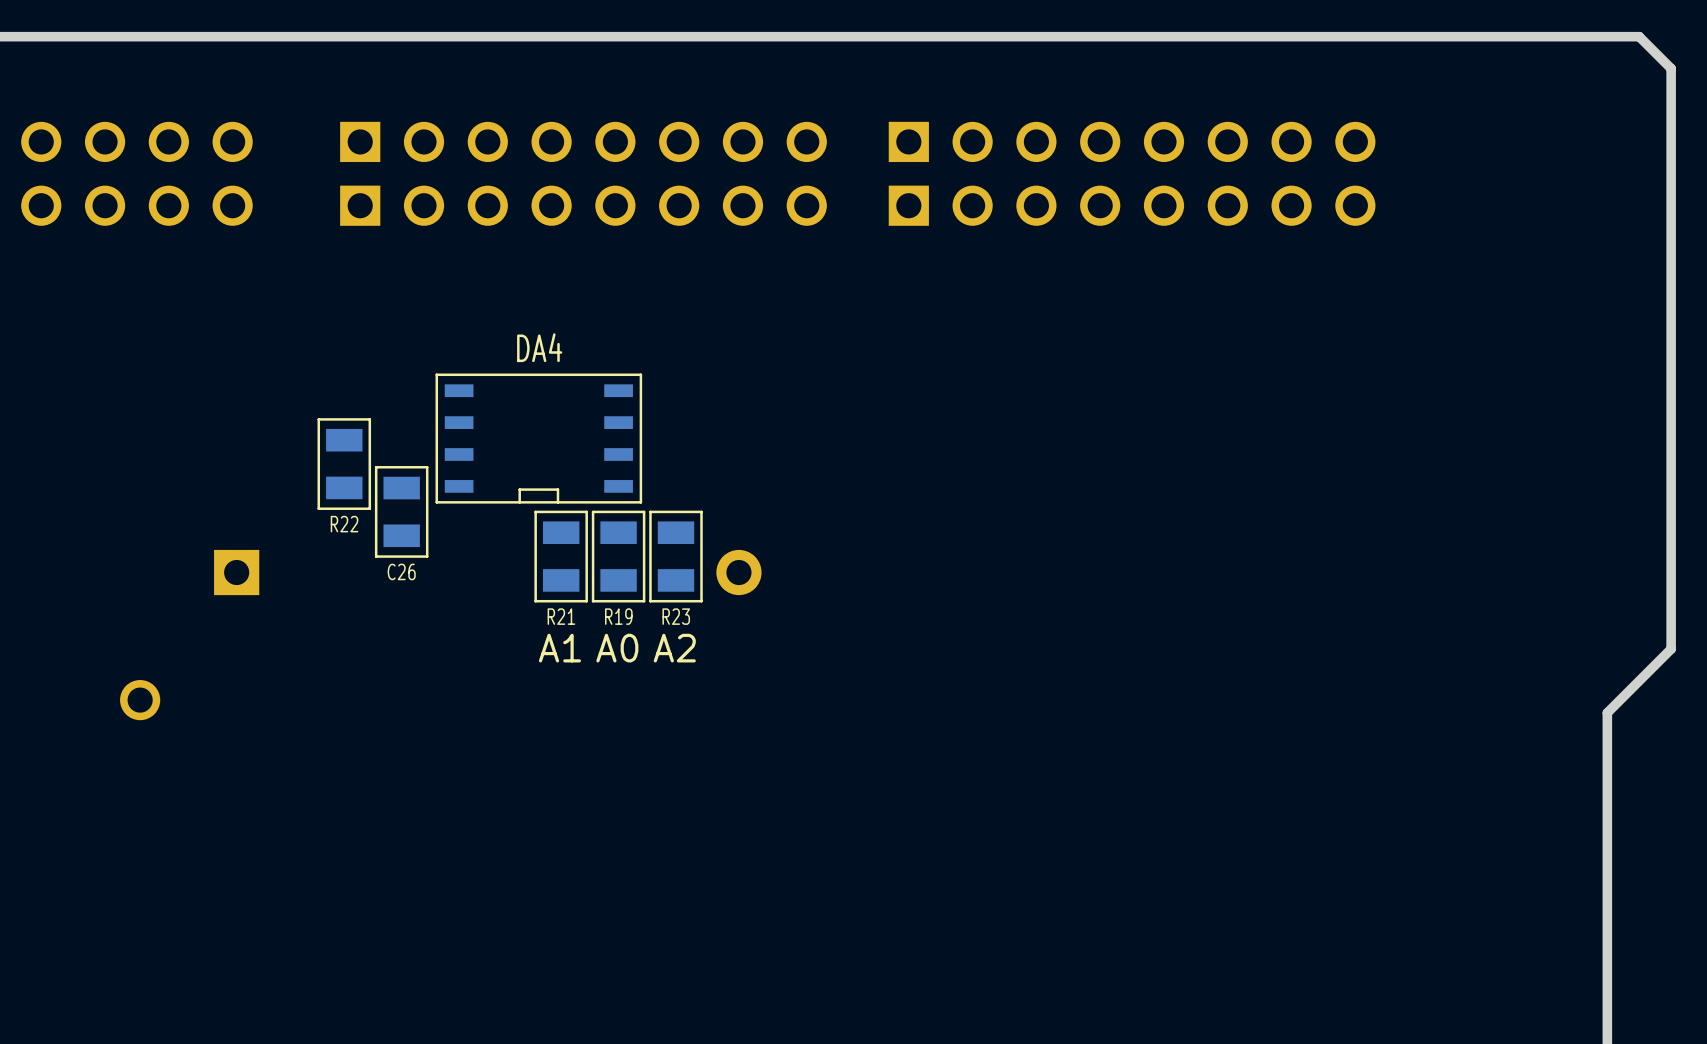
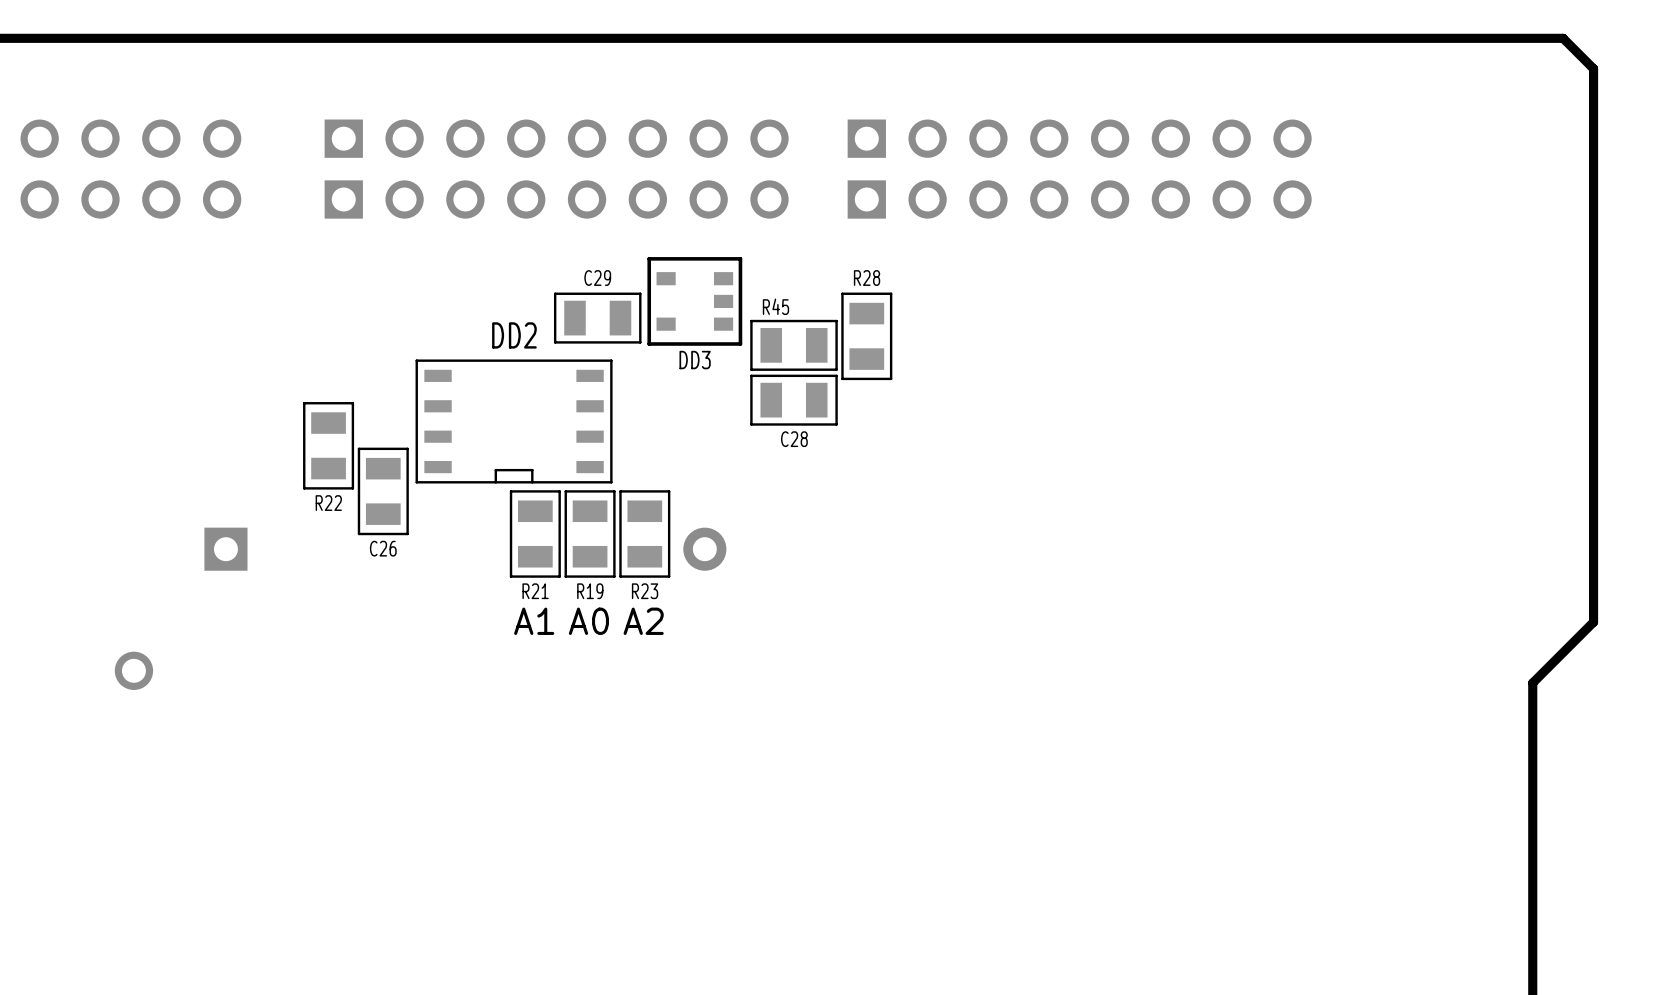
DD3: none -> (694, 301)
C29: none -> (597, 318)
DA4 name: DA4 (539, 347) -> DD2 (514, 335)
R28: none -> (866, 336)
R45: none -> (794, 345)
C28: none -> (794, 400)

